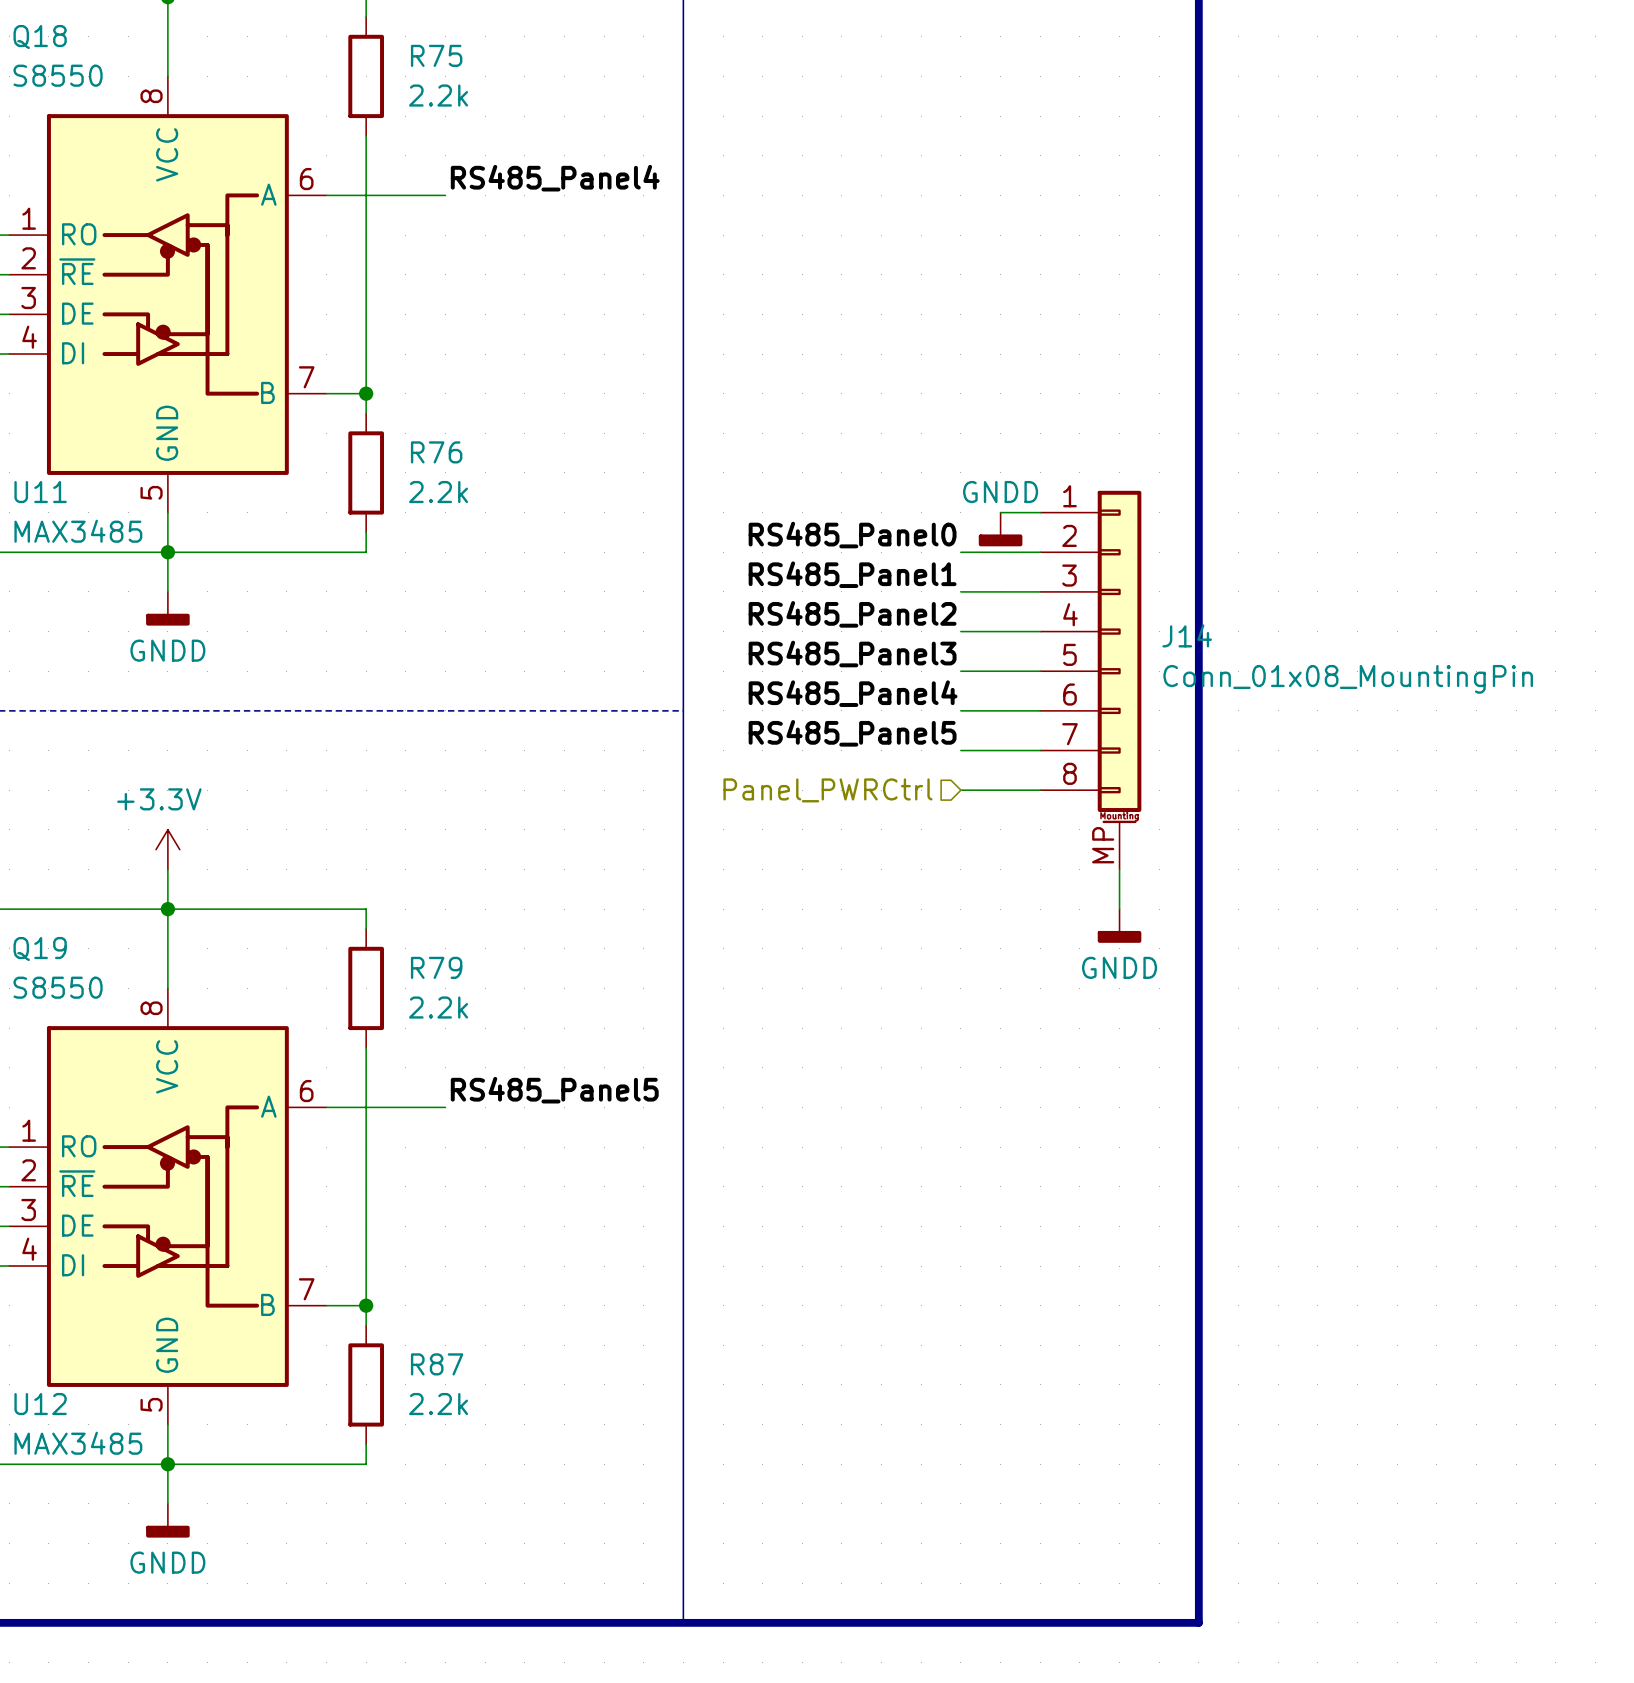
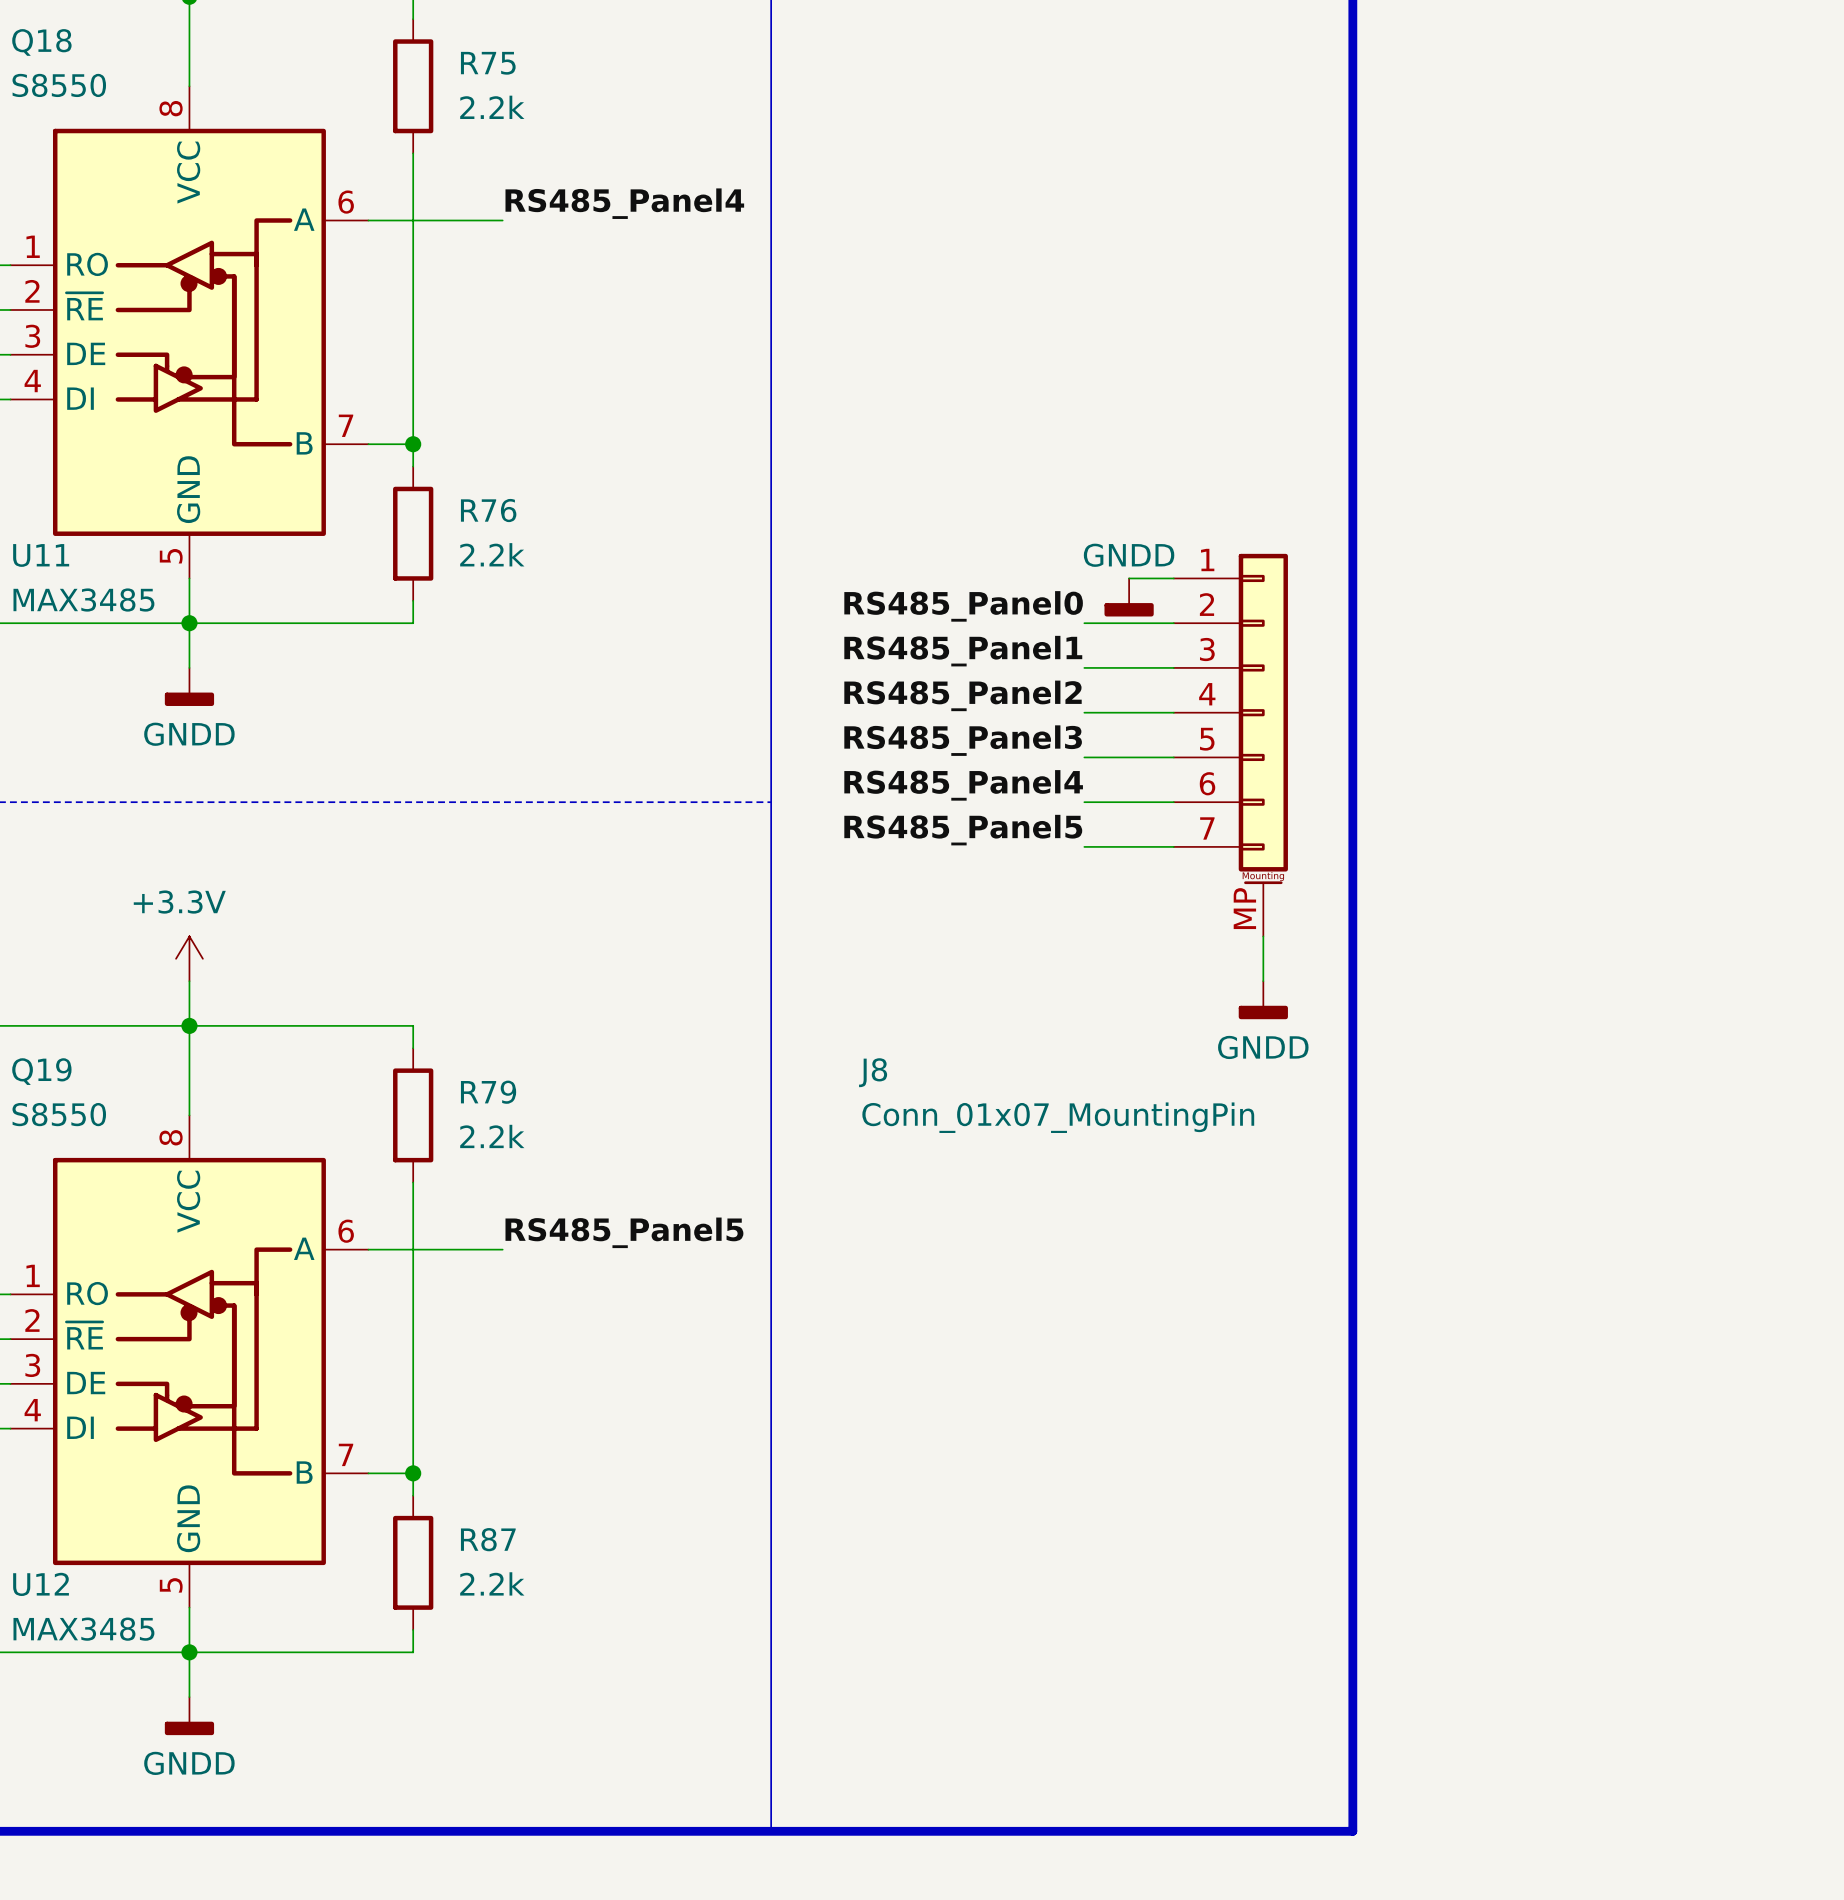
J8: none -> Conn_01x07_MountingPin (1230, 745)
J14: Conn_01x08_MountingPin (1090, 680) -> none
hierarchical label: Panel_PWRCtrl (827, 790) -> none
wire: (960, 790) (1040, 790) -> none
power symbol position: GNDD (1119, 925) -> GNDD (1263, 1000)

